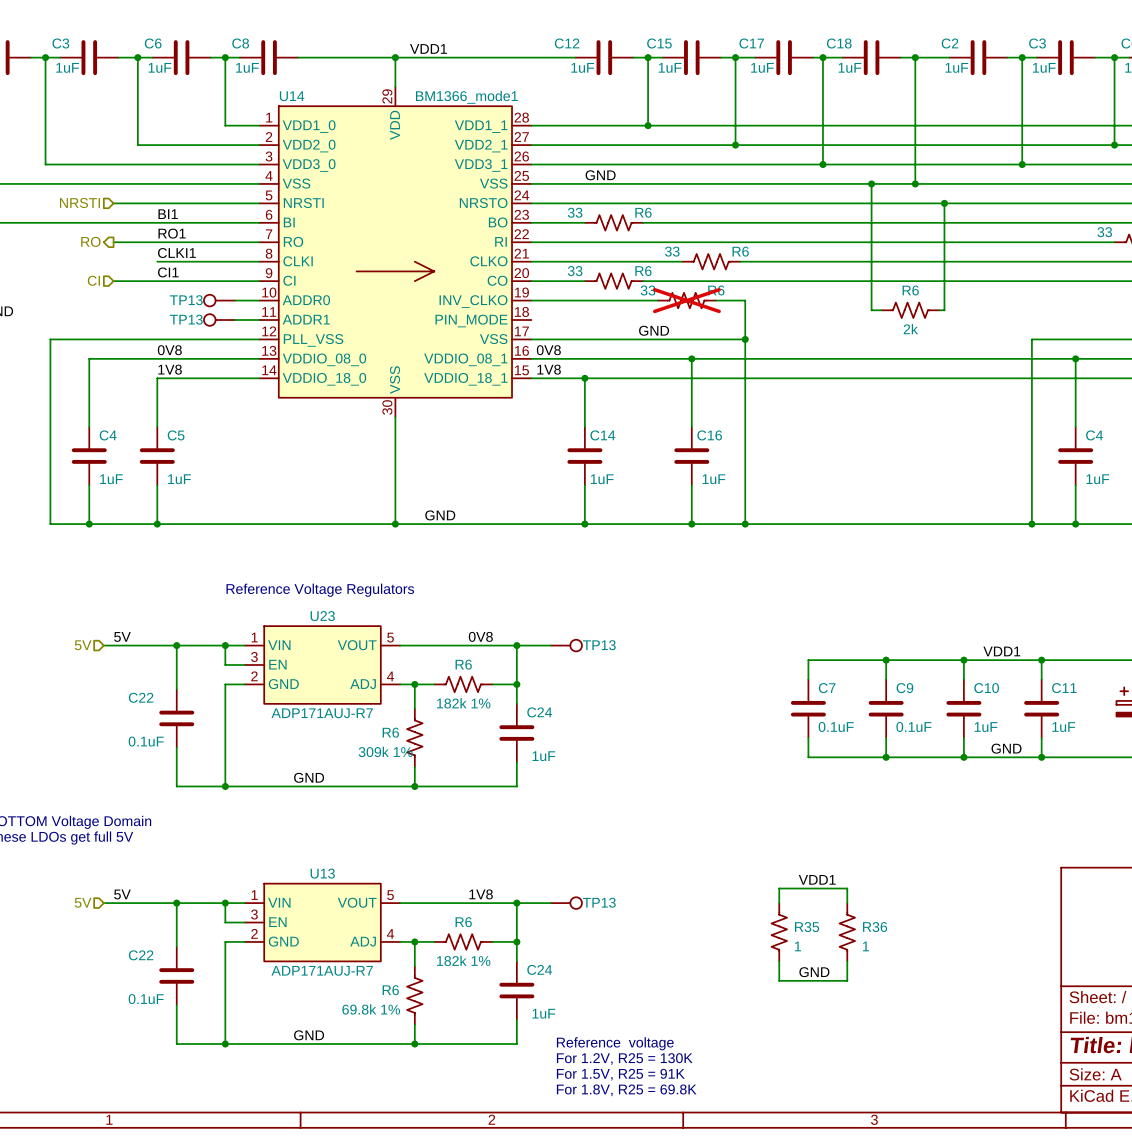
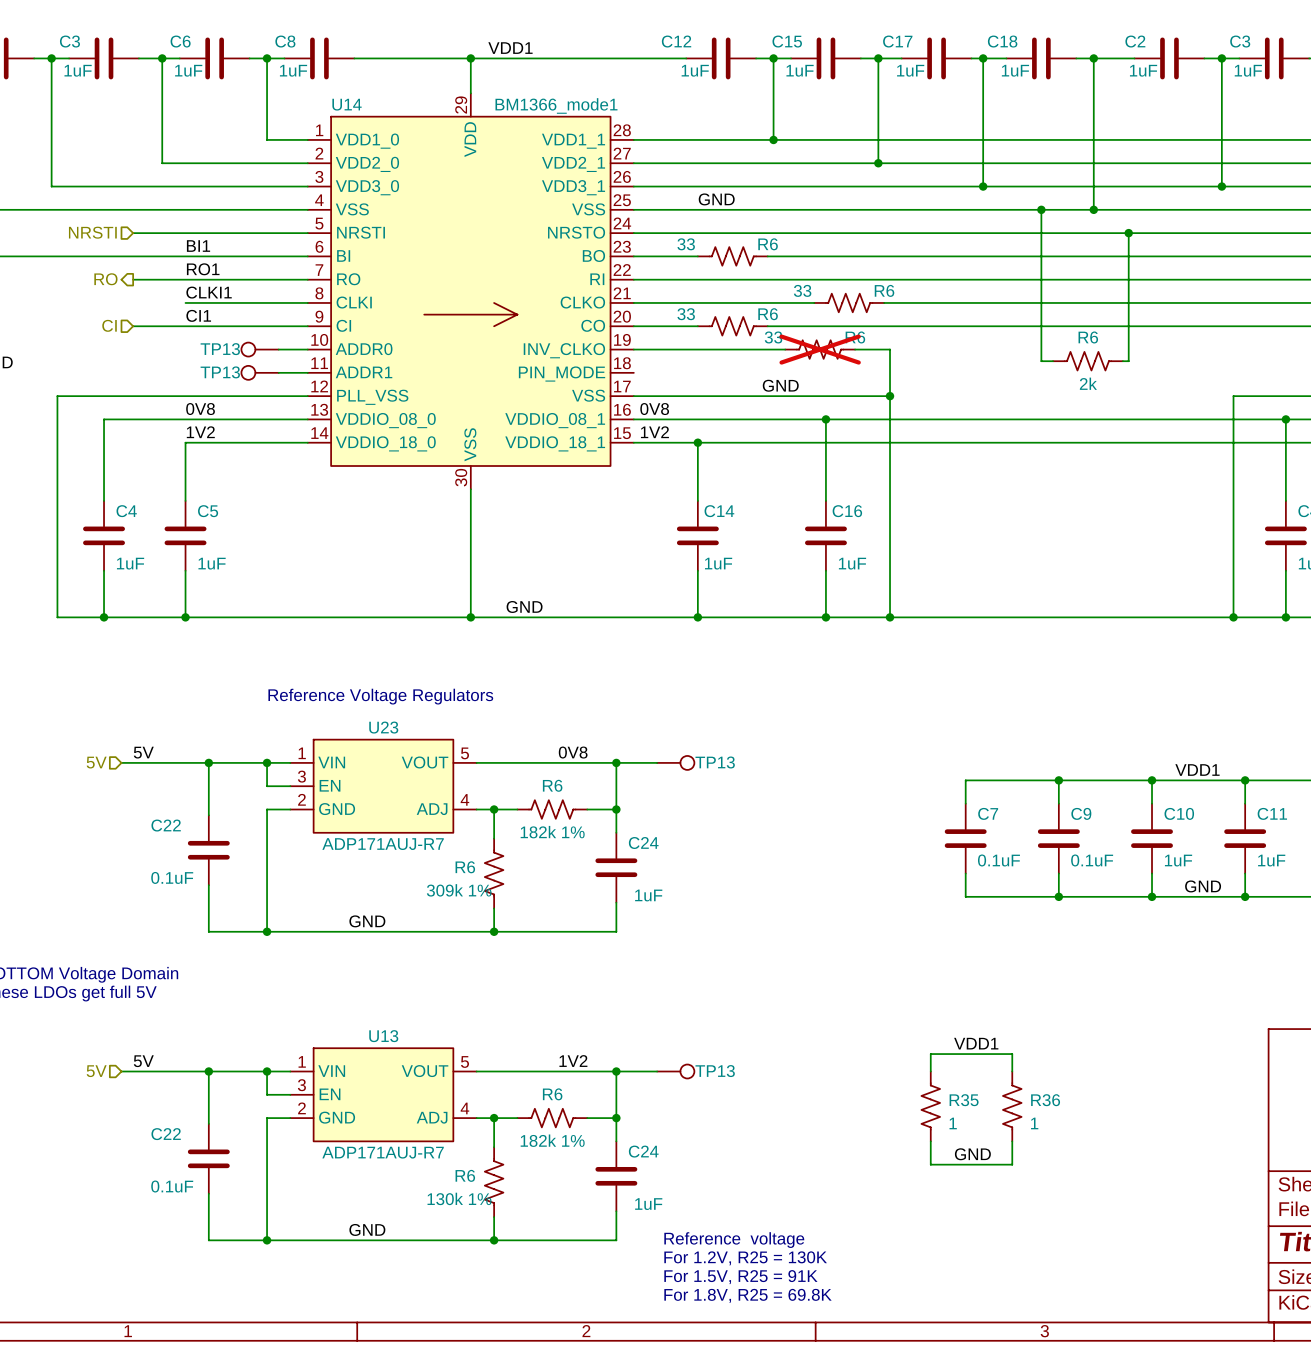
label: 1V8 (170, 369) -> 1V2 (200, 432)
label: 1V8 (549, 369) -> 1V2 (654, 432)
label: 1V8 (481, 894) -> 1V2 (573, 1061)
R6 value: 69.8k 1% (371, 1009) -> 130k 1% (459, 1198)

